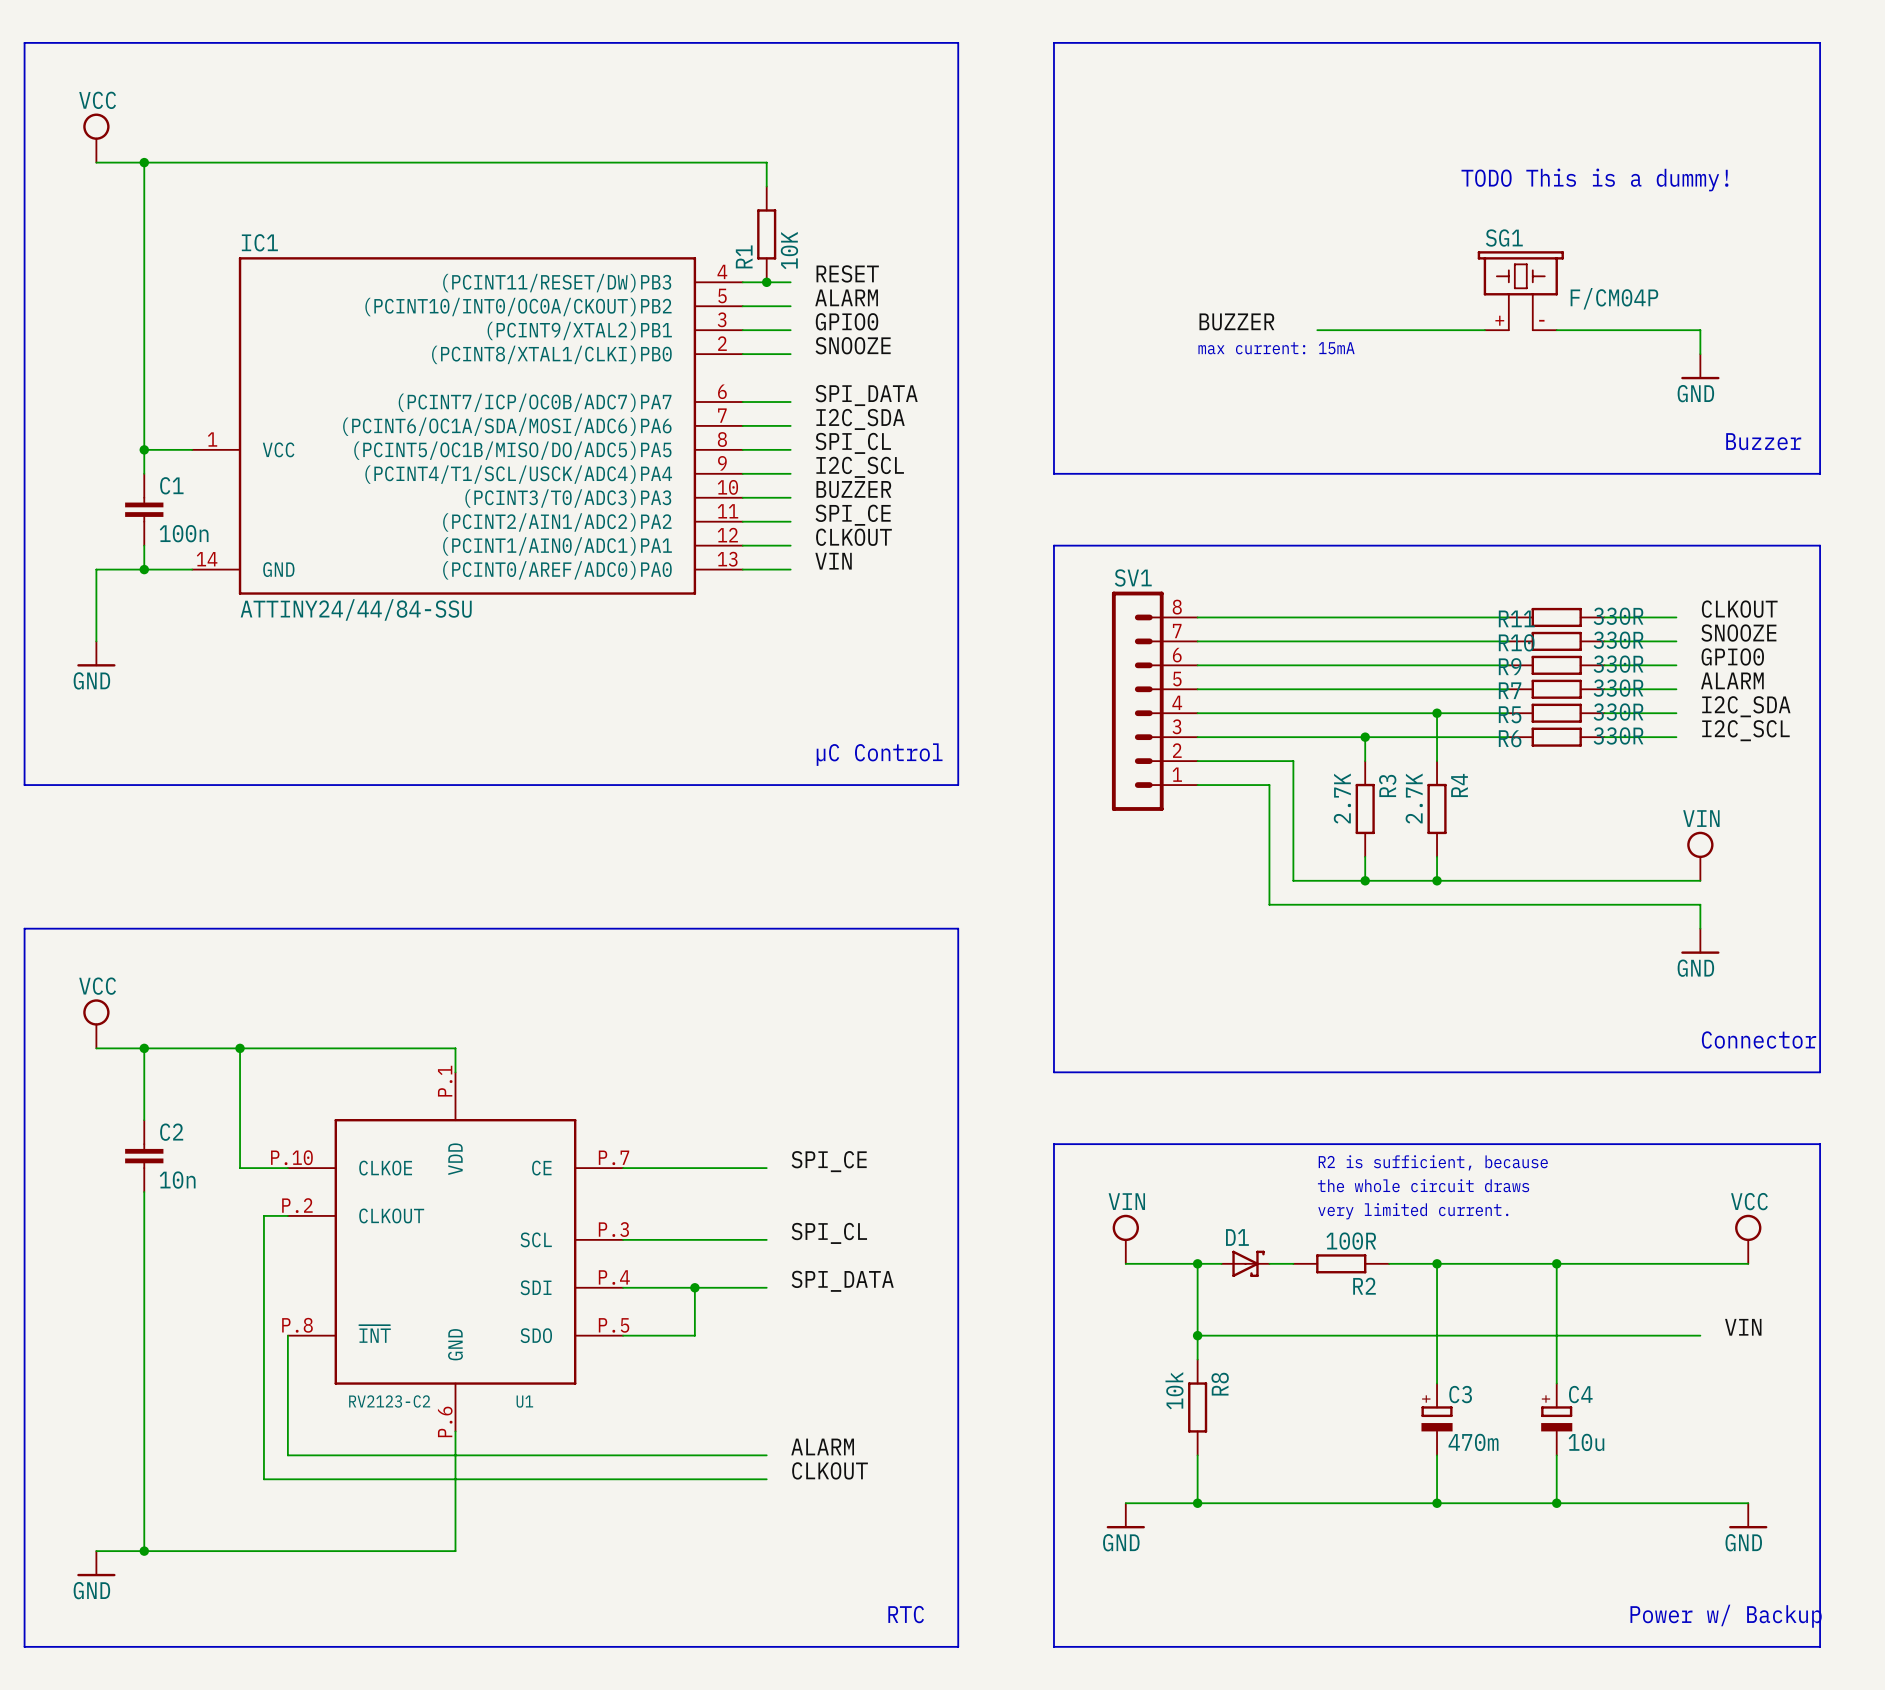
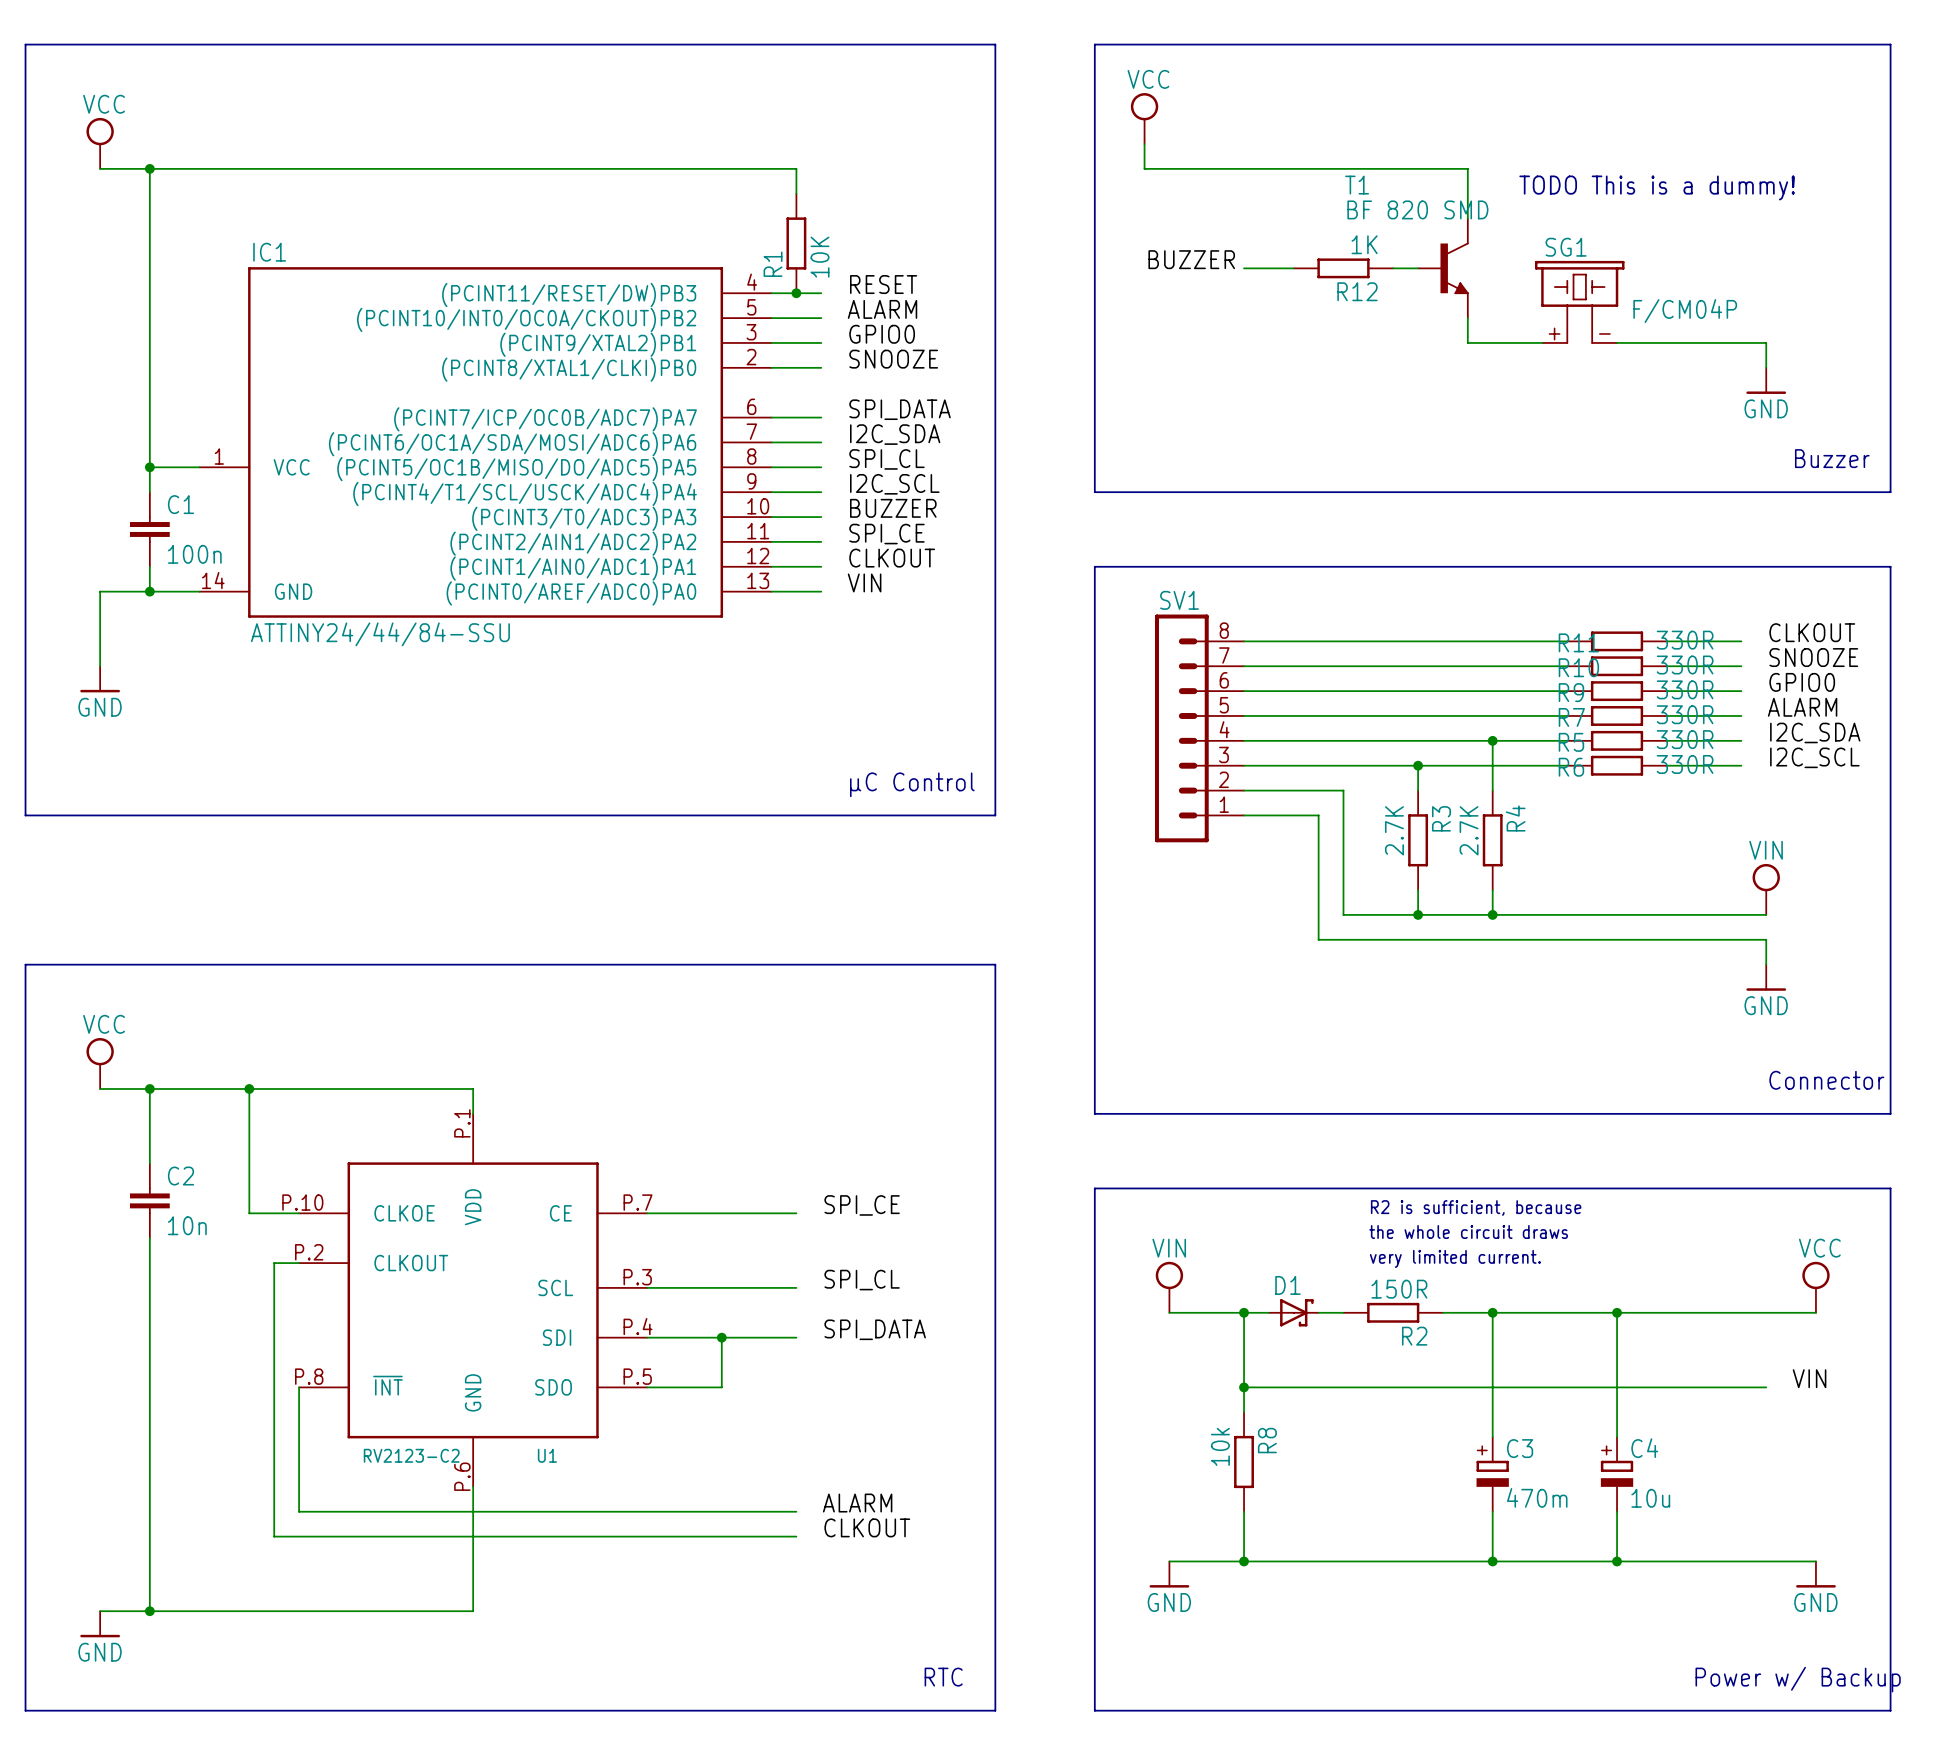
power symbol: none -> VCC (1144, 118)
wire: none -> (1144, 144) (1144, 168) (1467, 168) (1467, 218)
wire: none -> (1244, 268) (1293, 268)
R12: none -> 1K (1343, 268)
wire: none -> (1393, 268) (1418, 268)
T1: none -> BF 820 SMD (1443, 268)
label position: BUZZER (1236, 321) -> BUZZER (1191, 259)
wire: (1317, 330) (1413, 330) -> (1467, 318) (1467, 342)
text: max current: 15mA (1276, 348) -> none
R2 value: 100R (1351, 1241) -> 150R (1399, 1289)

